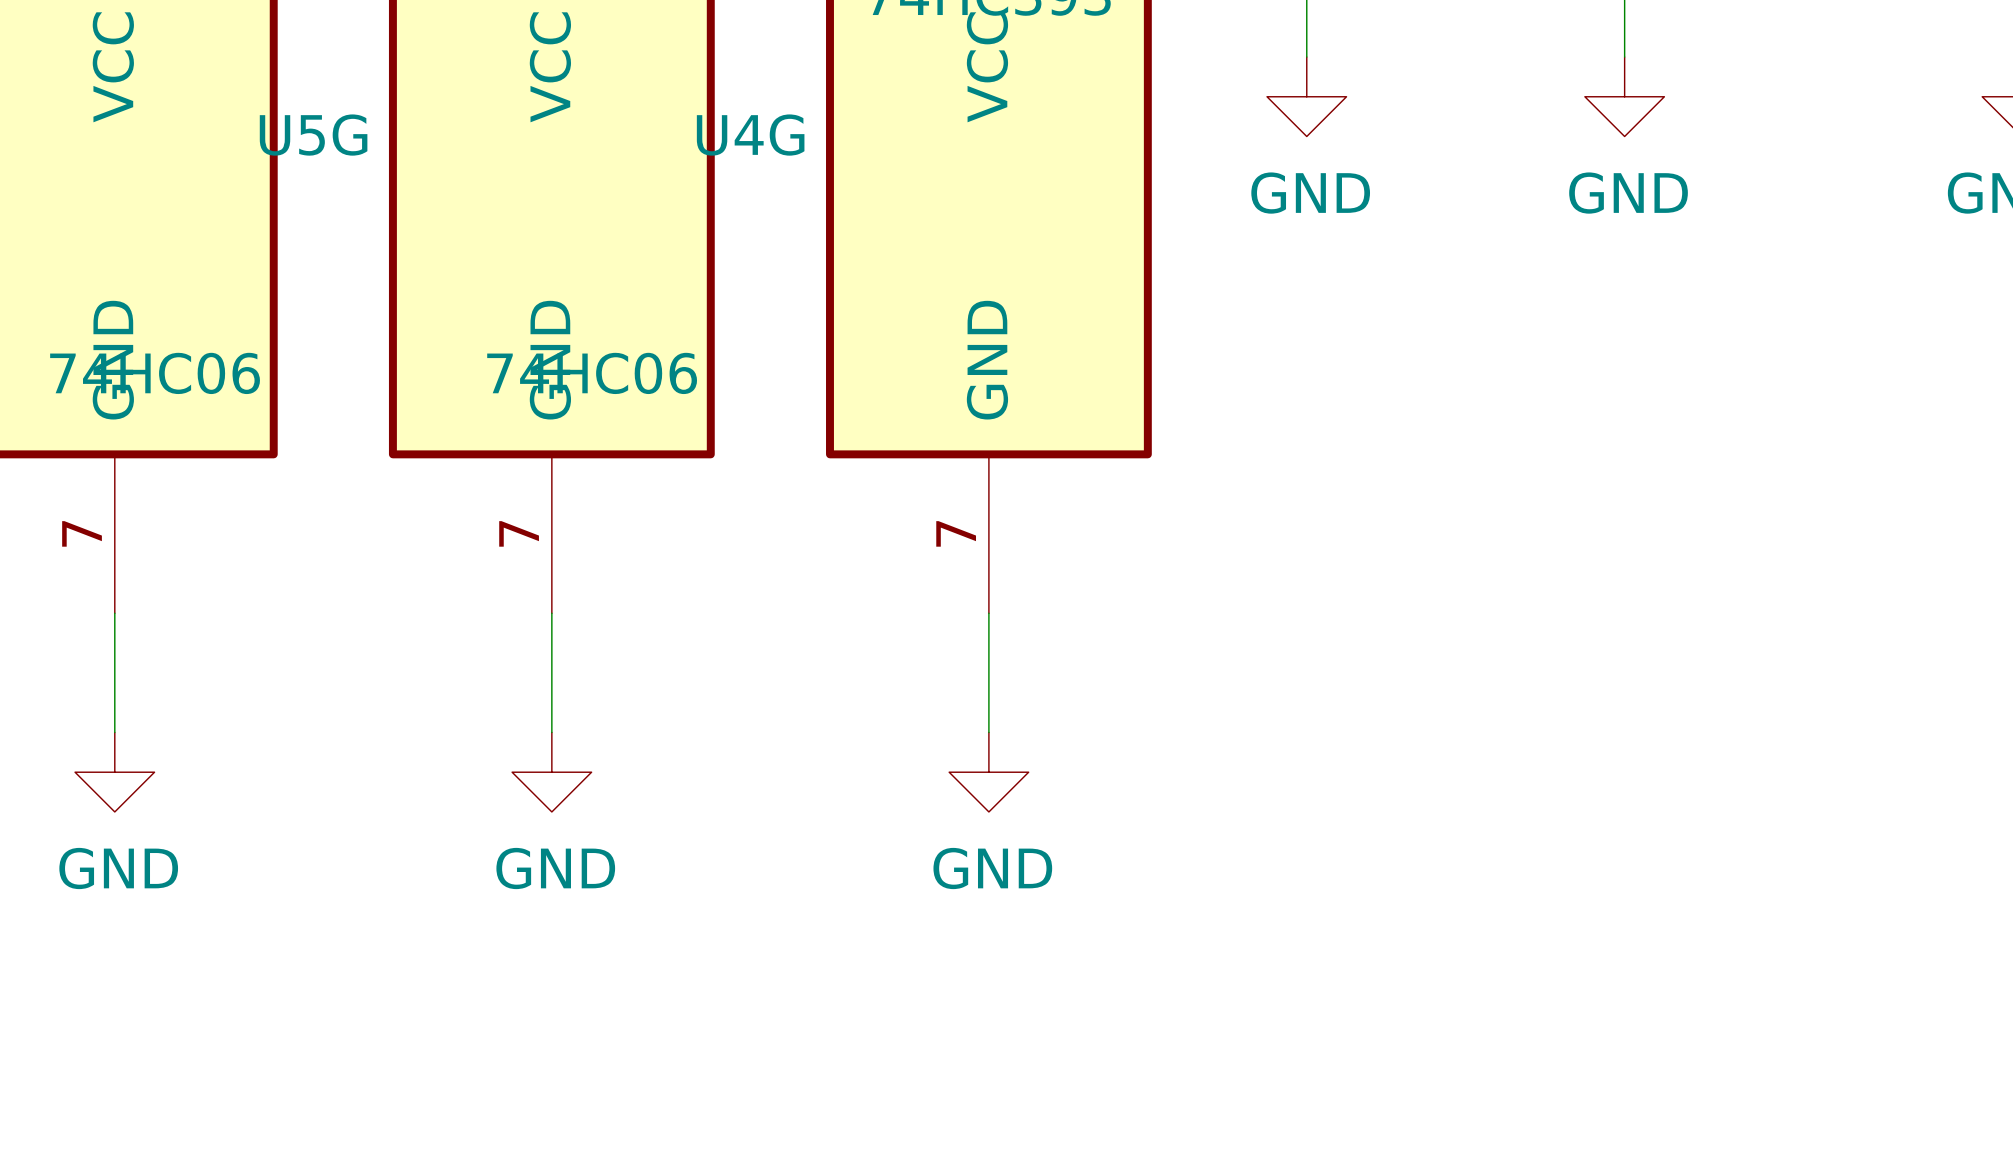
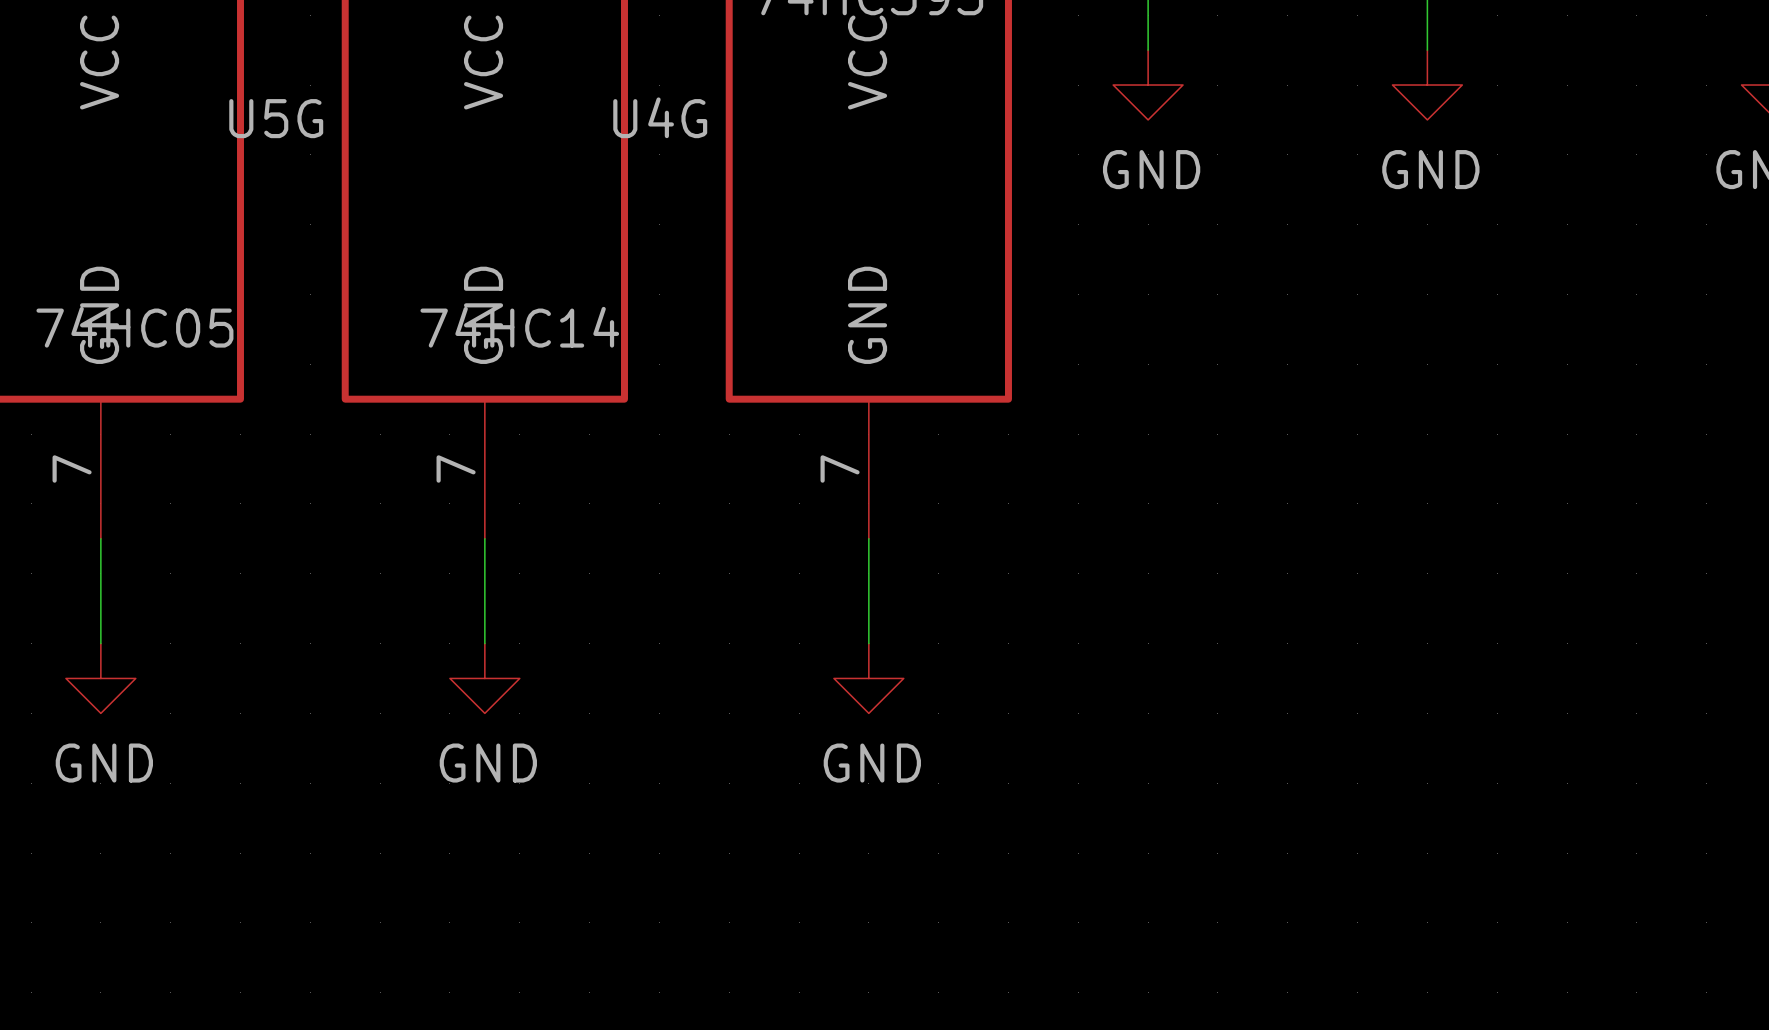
U5G value: 74HC06 (155, 373) -> 74HC05 (134, 327)
U4G value: 74HC06 (592, 373) -> 74HC14 (519, 327)

